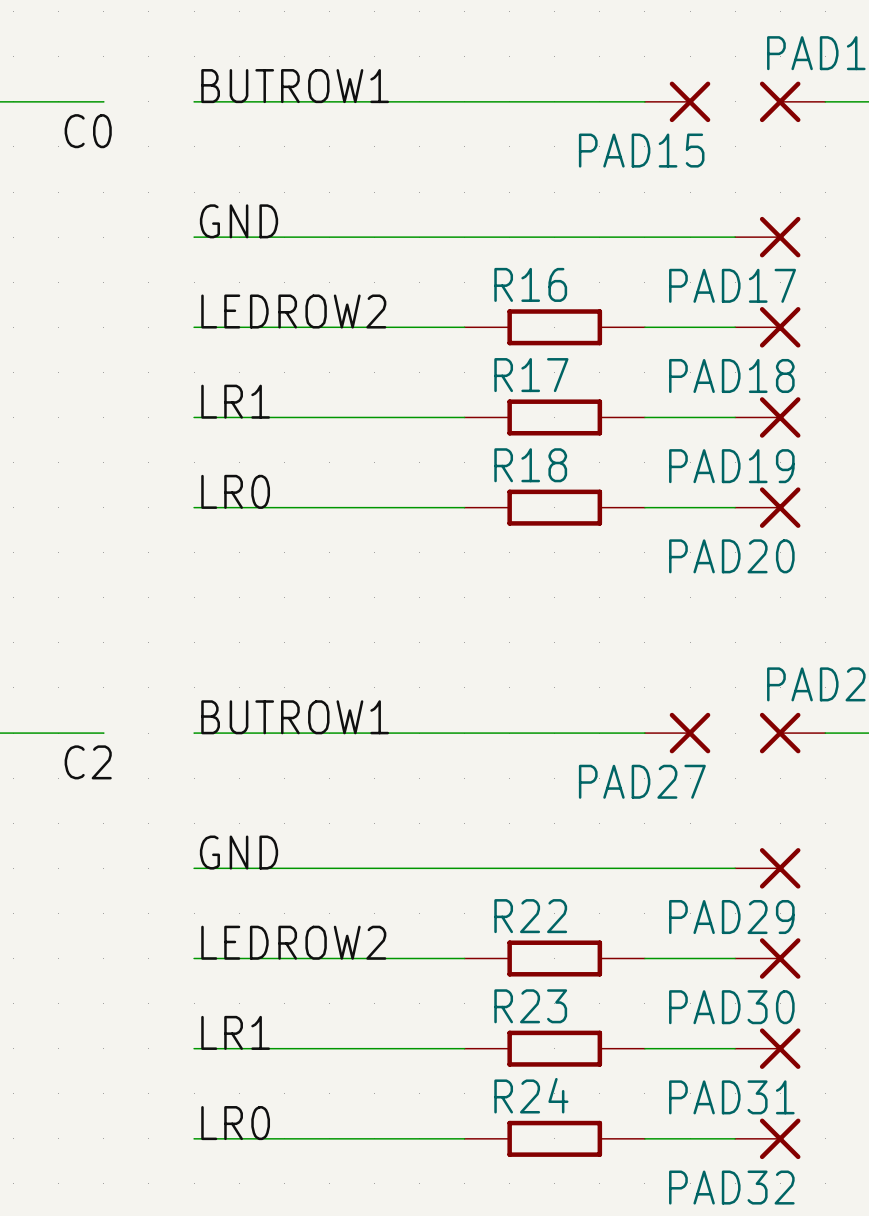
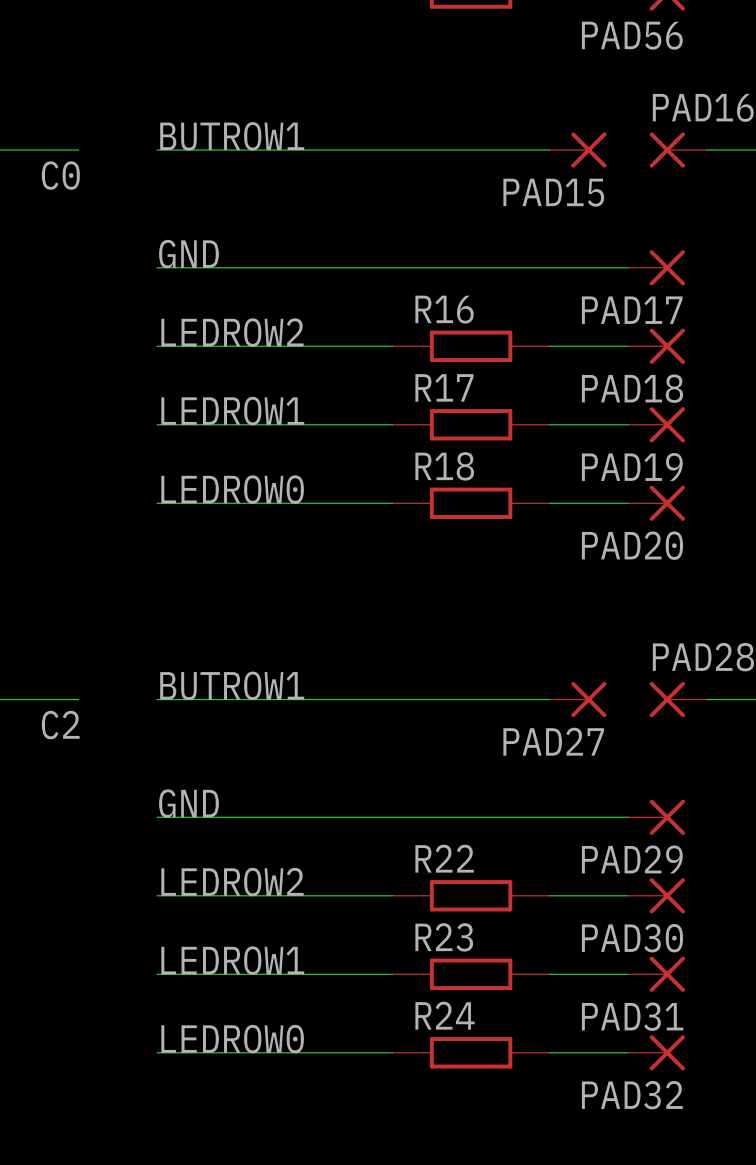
label: LR1 (235, 401) -> LEDROW1 (232, 411)
label: LR0 (235, 491) -> LEDROW0 (232, 489)
label: LR1 (235, 1032) -> LEDROW1 (232, 960)
label: LR0 (235, 1123) -> LEDROW0 (232, 1039)

